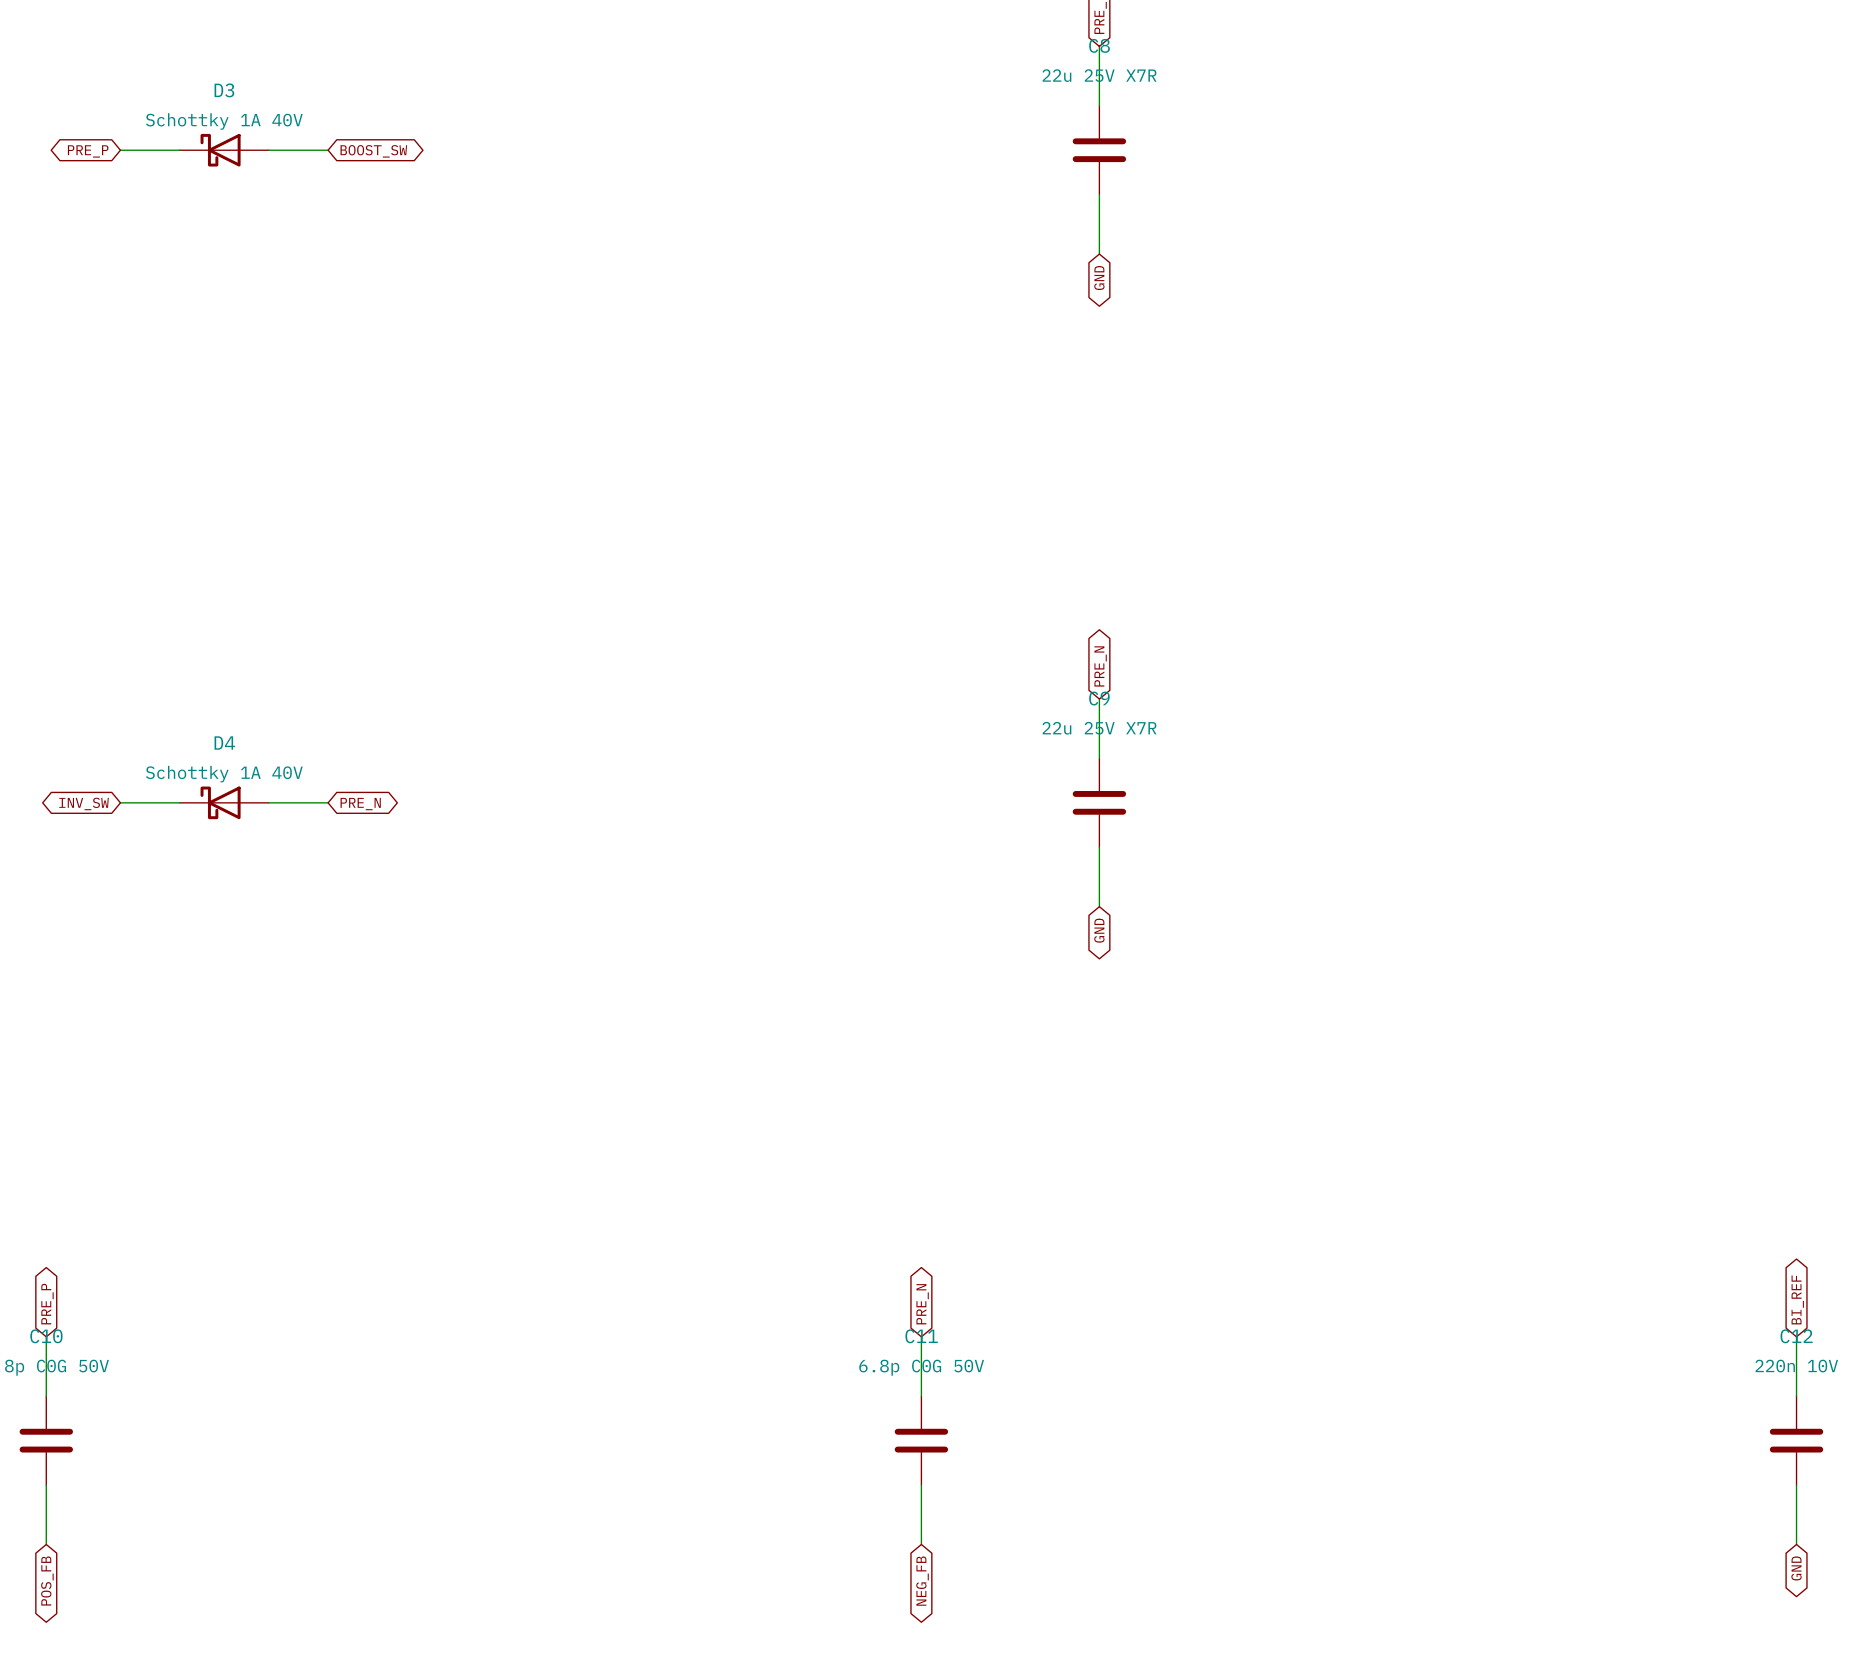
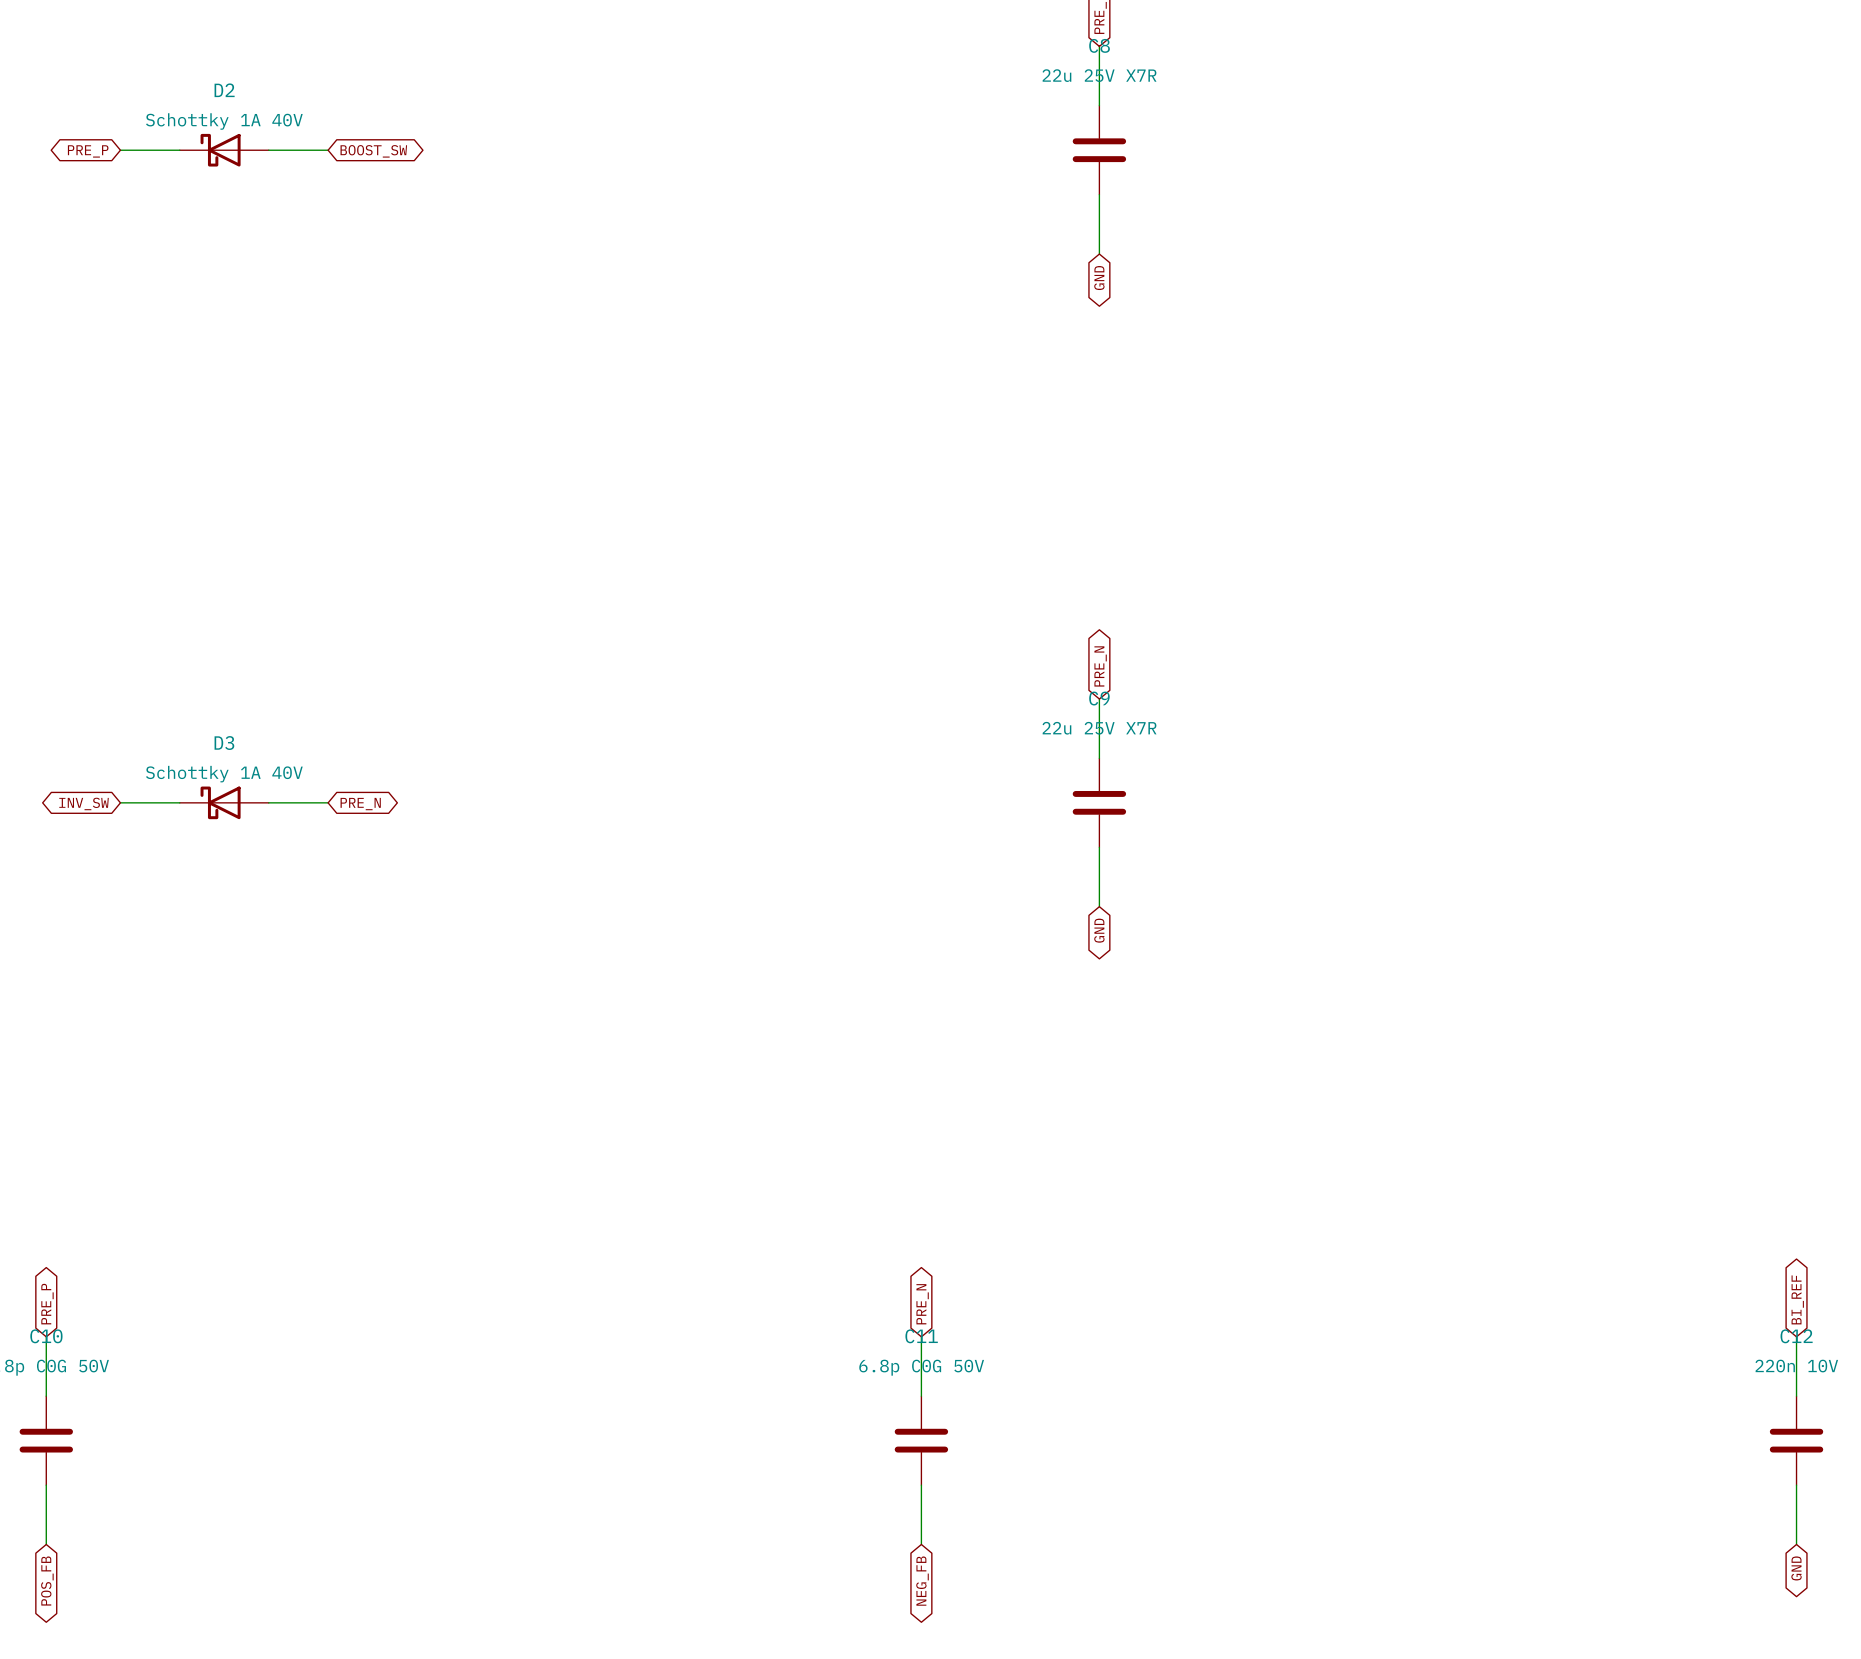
D3 name: D3 (224, 90) -> D2 (224, 90)
D4 name: D4 (224, 743) -> D3 (224, 743)

